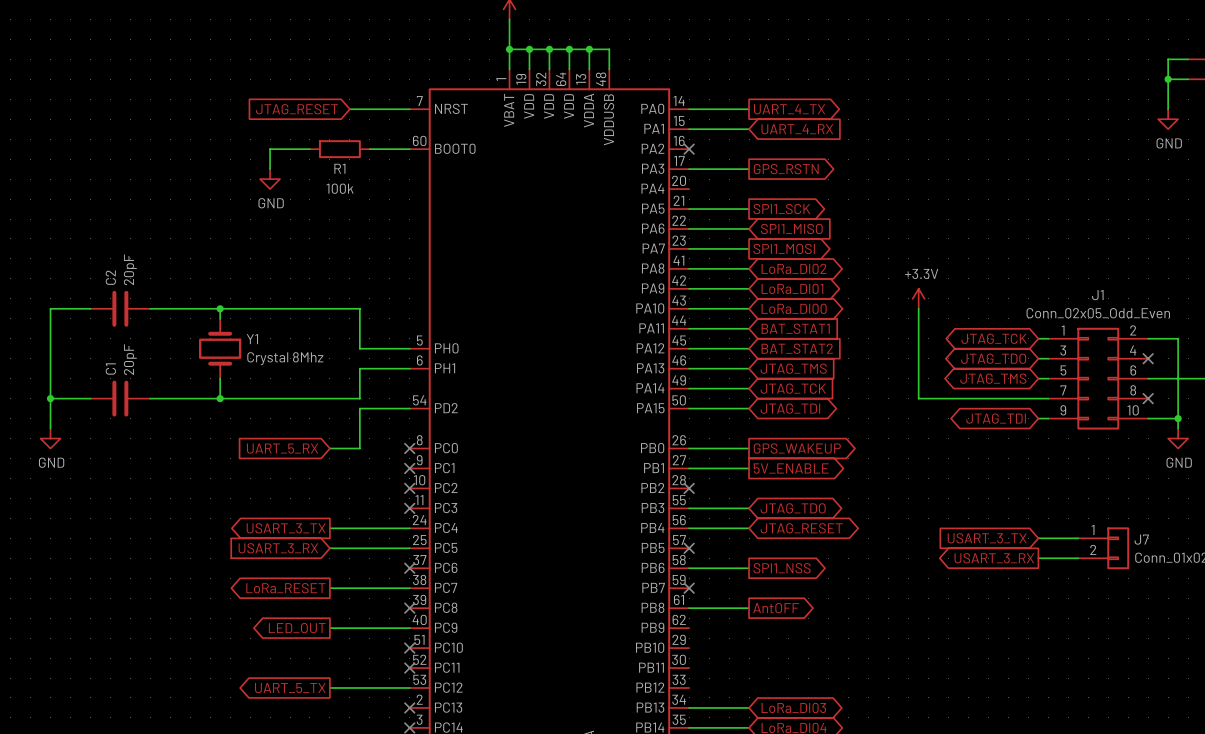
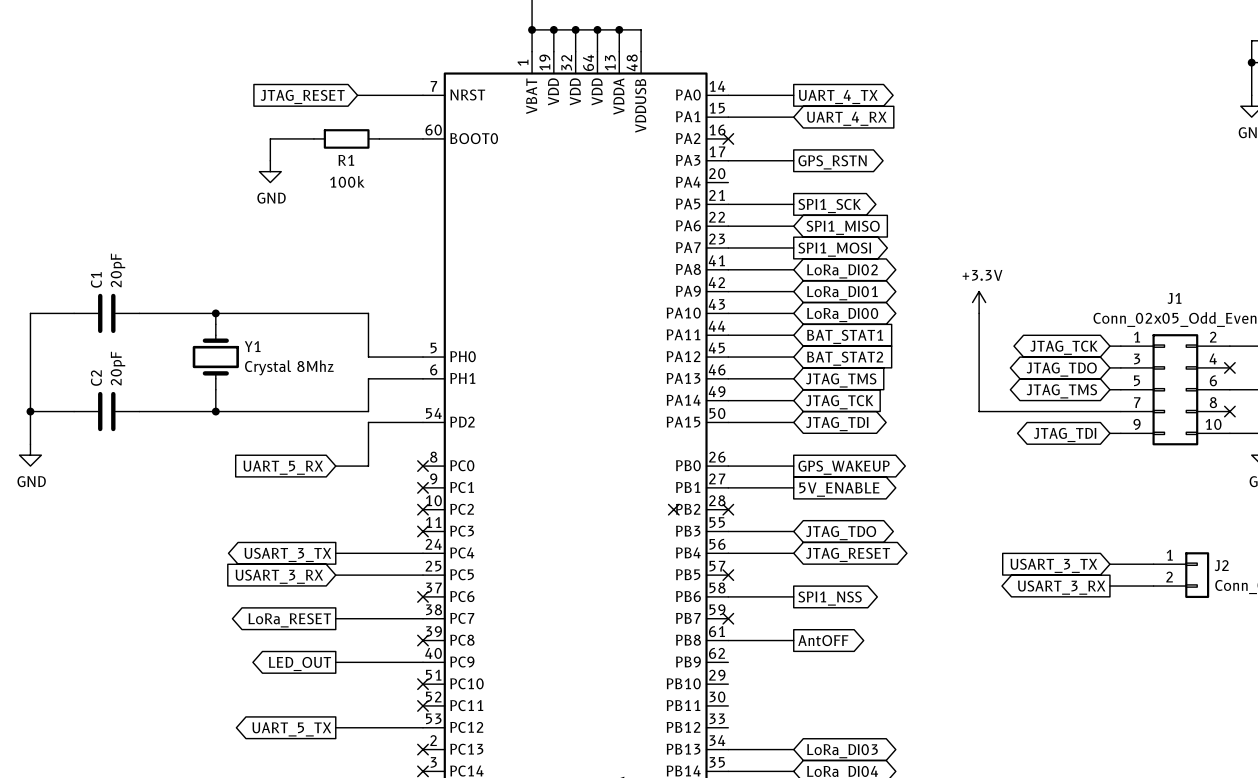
C2 name: C2 (110, 277) -> C1 (96, 279)
C1 name: C1 (110, 368) -> C2 (96, 378)
no-connect mark: none -> (673, 509)
J7 name: J7 (1141, 539) -> J2 (1221, 565)

